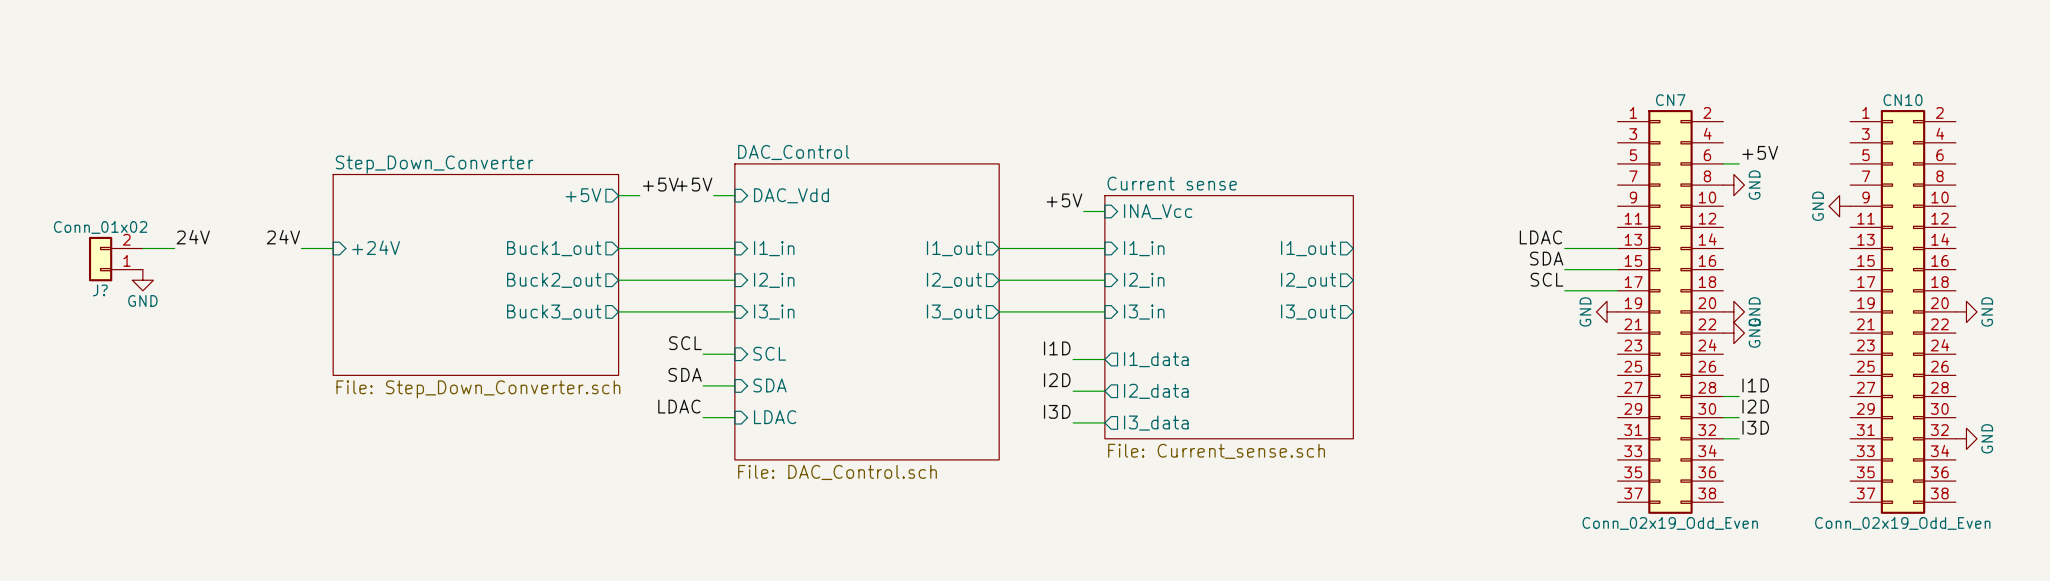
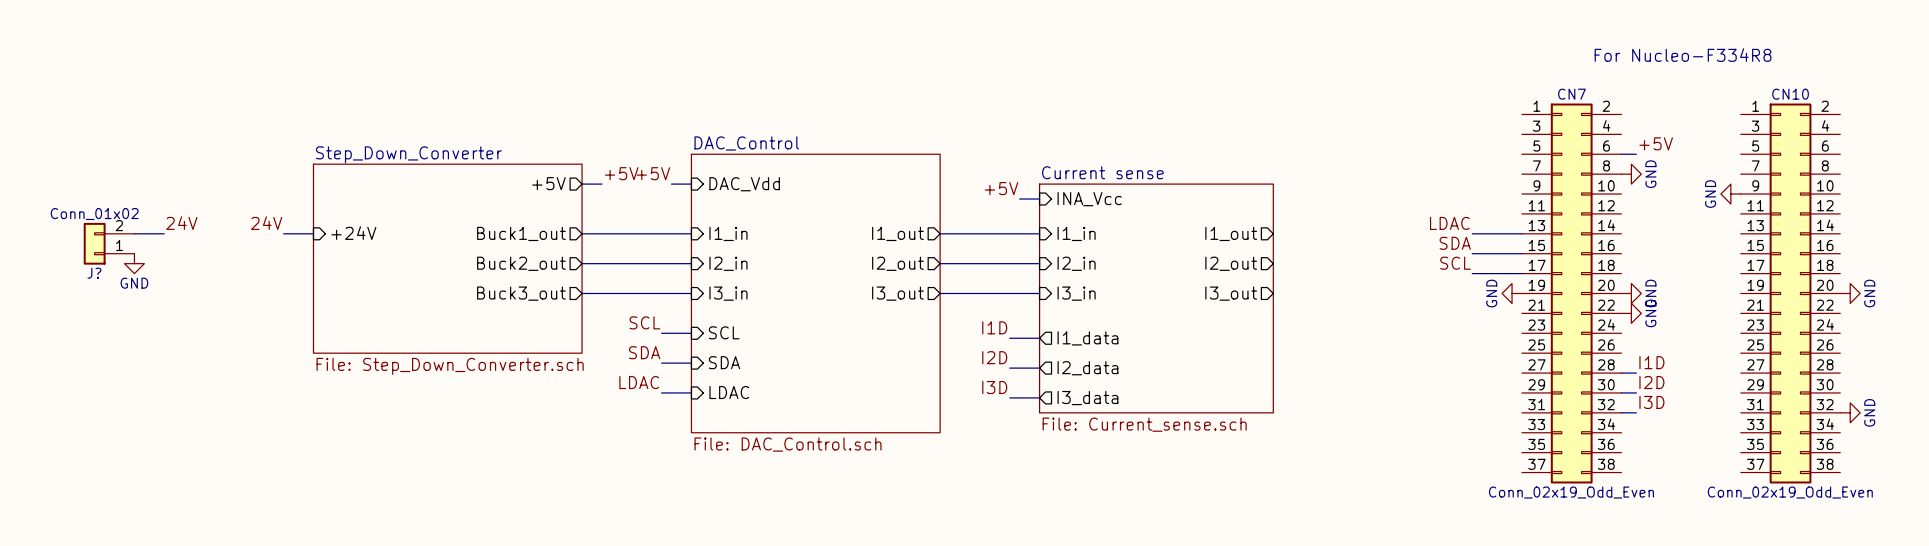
text: none -> For Nucleo-F334R8 (1683, 55)

